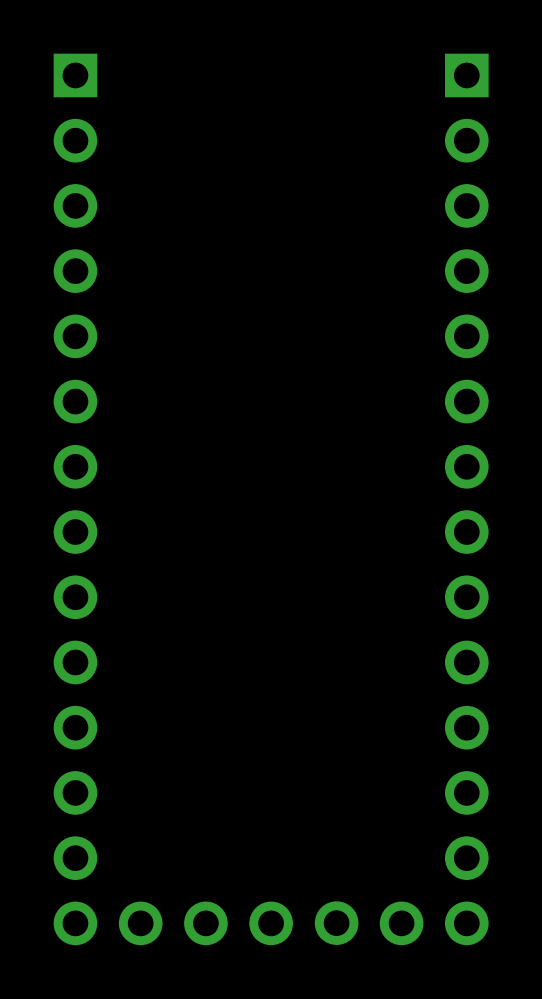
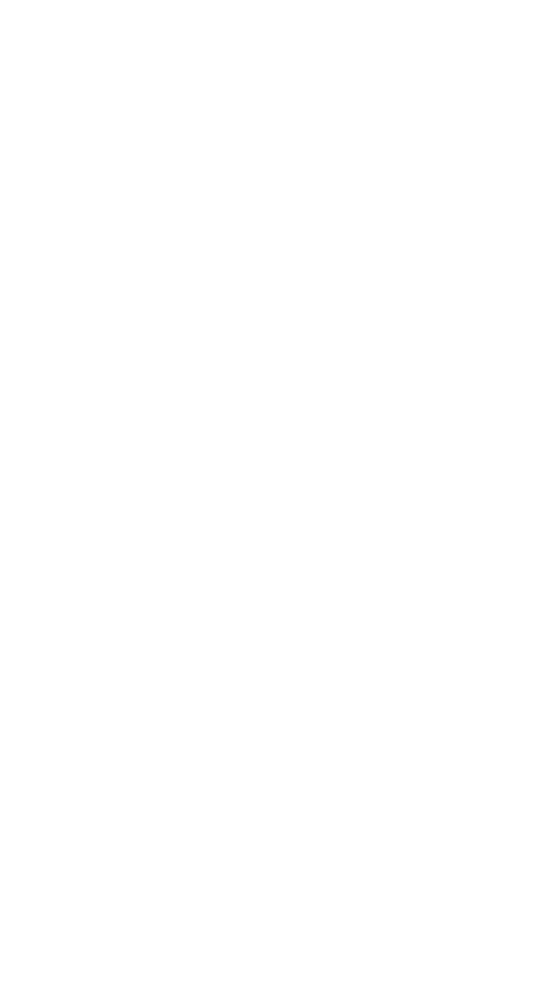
part: (271, 499) -> none

